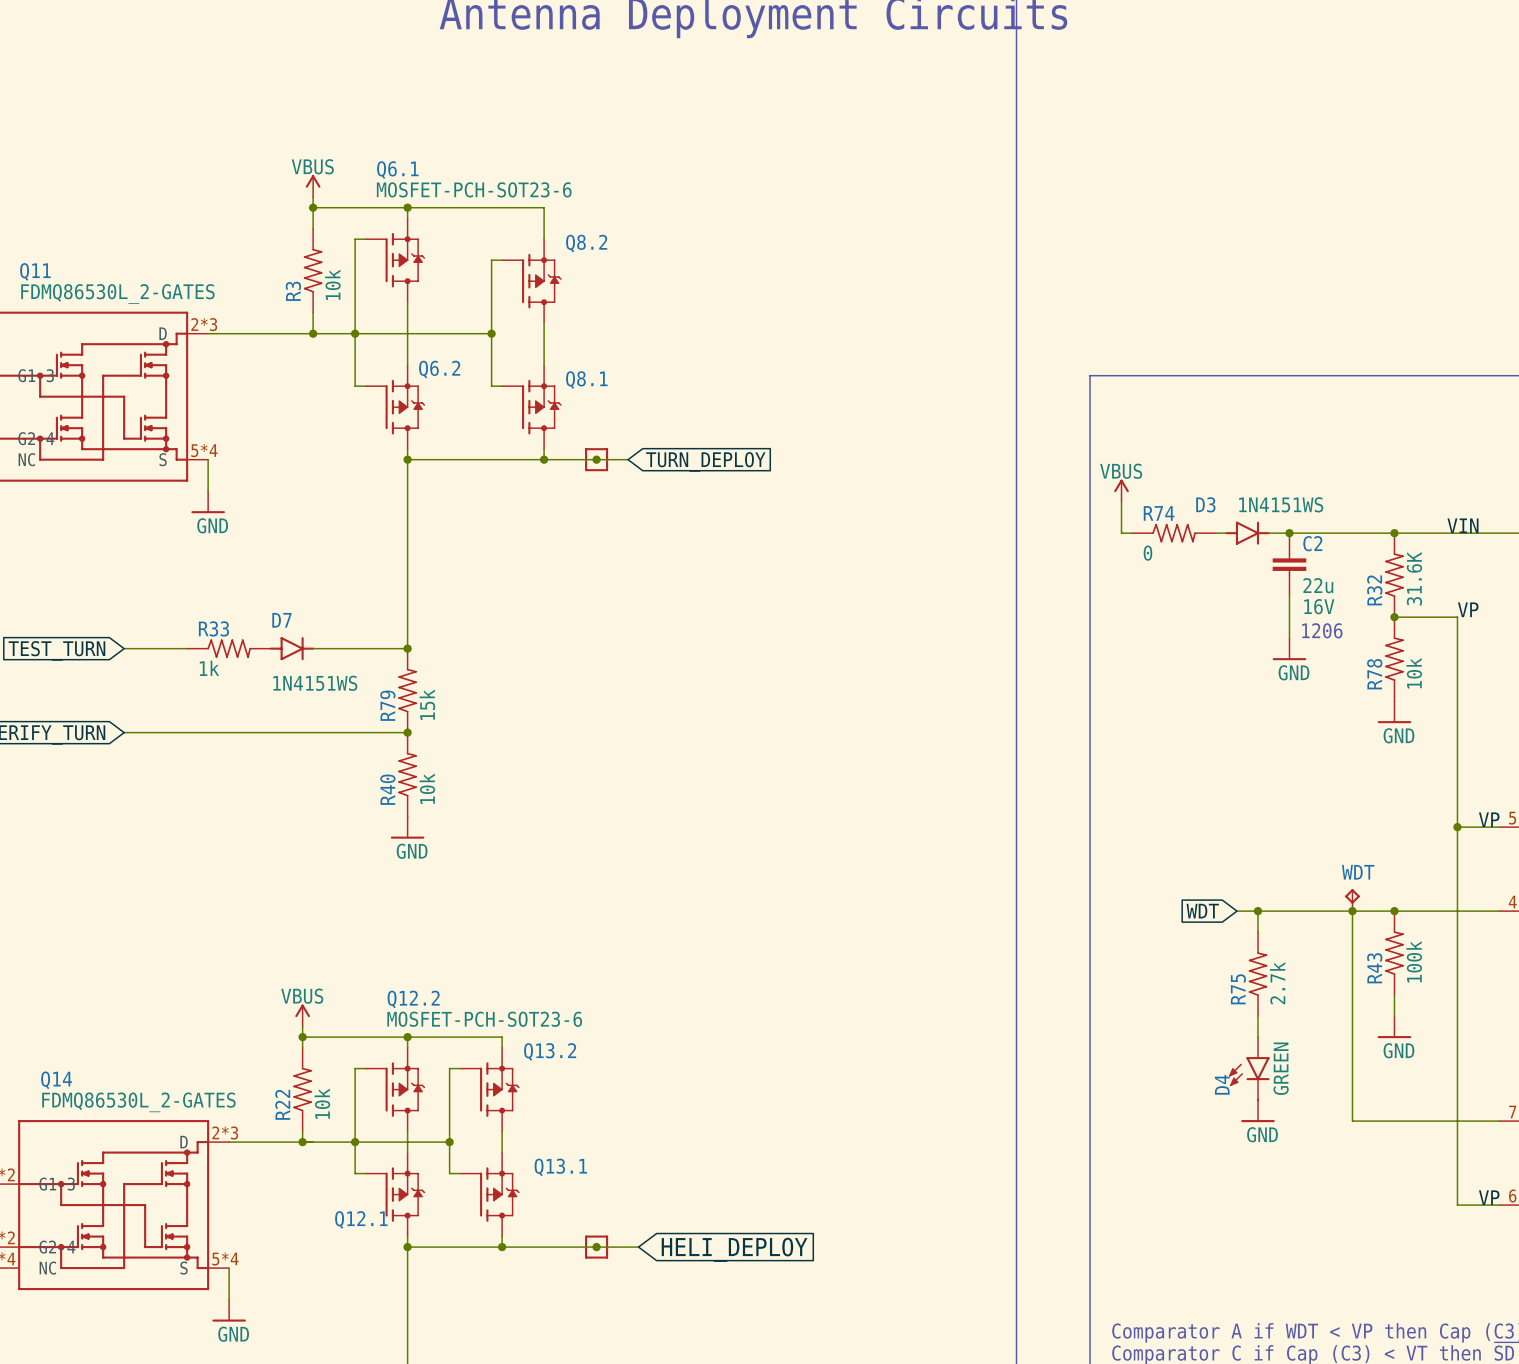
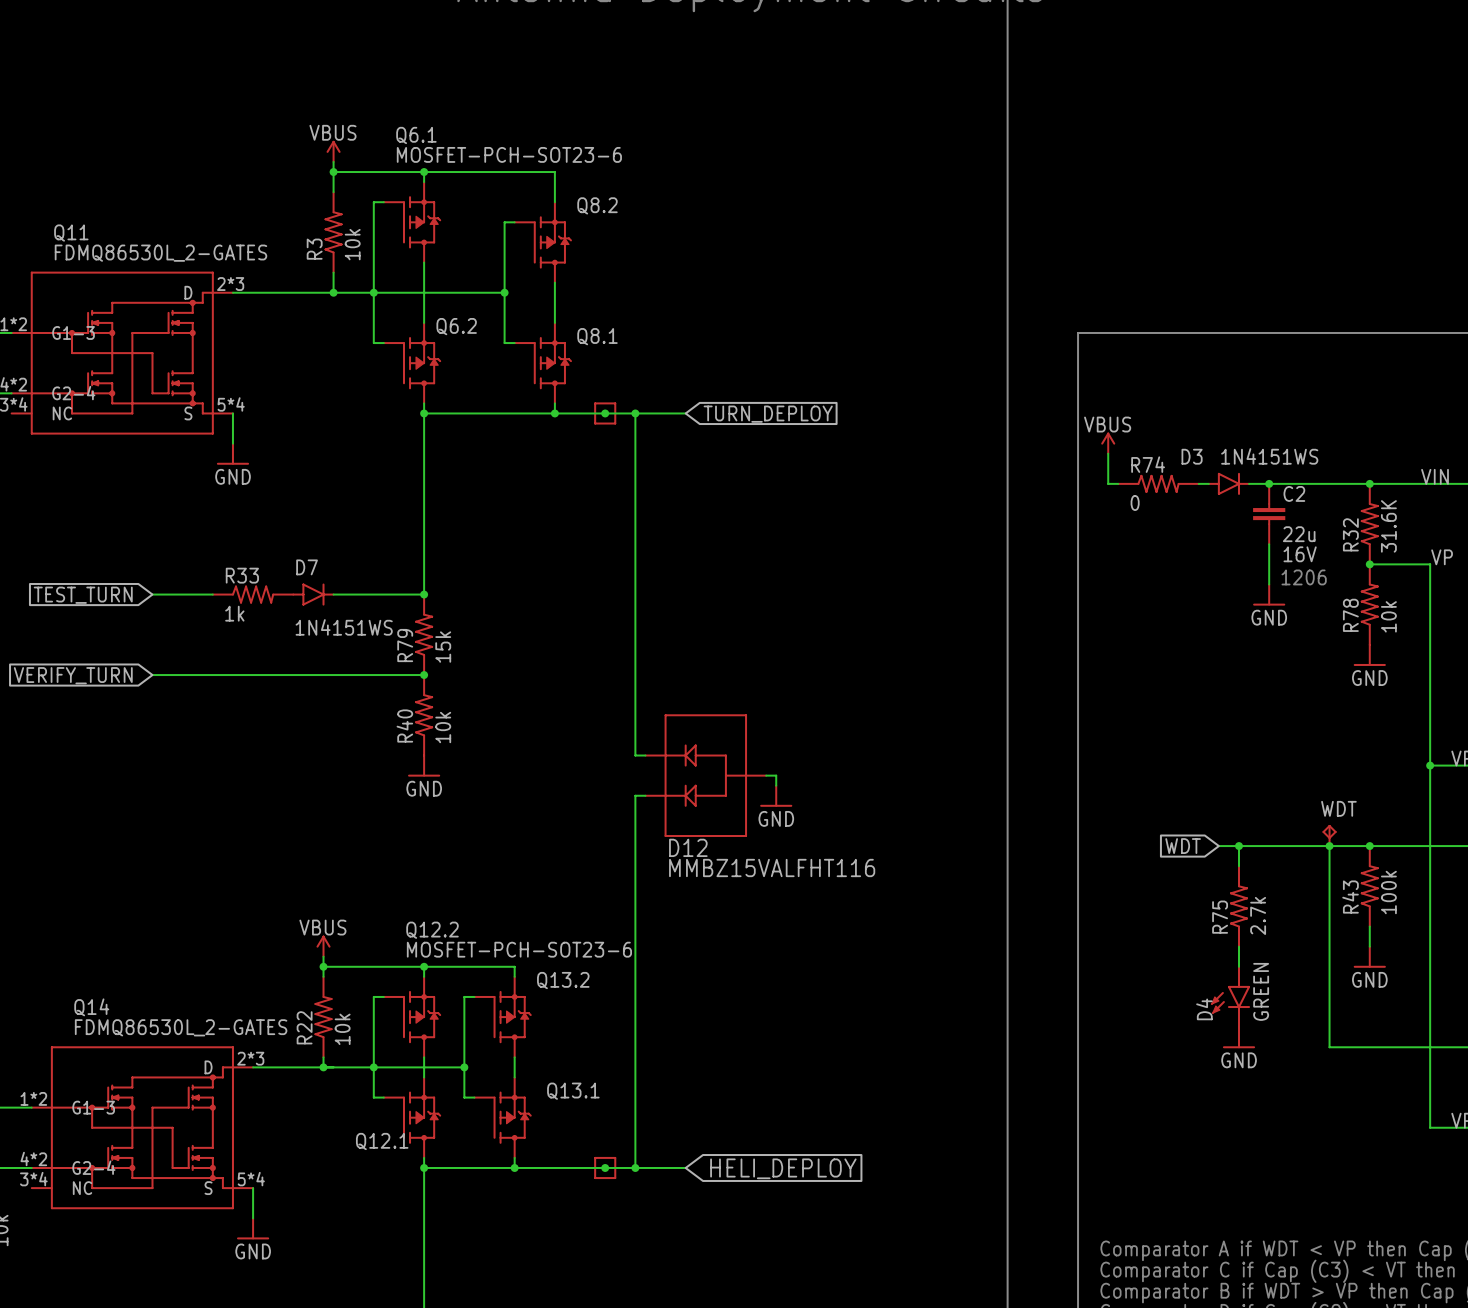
junction: none -> (635, 413)
wire: none -> (685, 413) (635, 413) (635, 755) (645, 755)
global label position: TURN_DEPLOY (705, 461) -> TURN_DEPLOY (768, 414)
D12: none -> MMBZ15VALFHT116 (705, 775)
wire: none -> (766, 775) (776, 775) (776, 785)
wire: none -> (645, 795) (635, 795) (635, 1167)
power symbol: none -> GND (776, 796)
junction: none -> (635, 1167)
wire: none -> (645, 1167) (685, 1167)
global label position: HELI_DEPLOY (734, 1249) -> HELI_DEPLOY (783, 1168)

